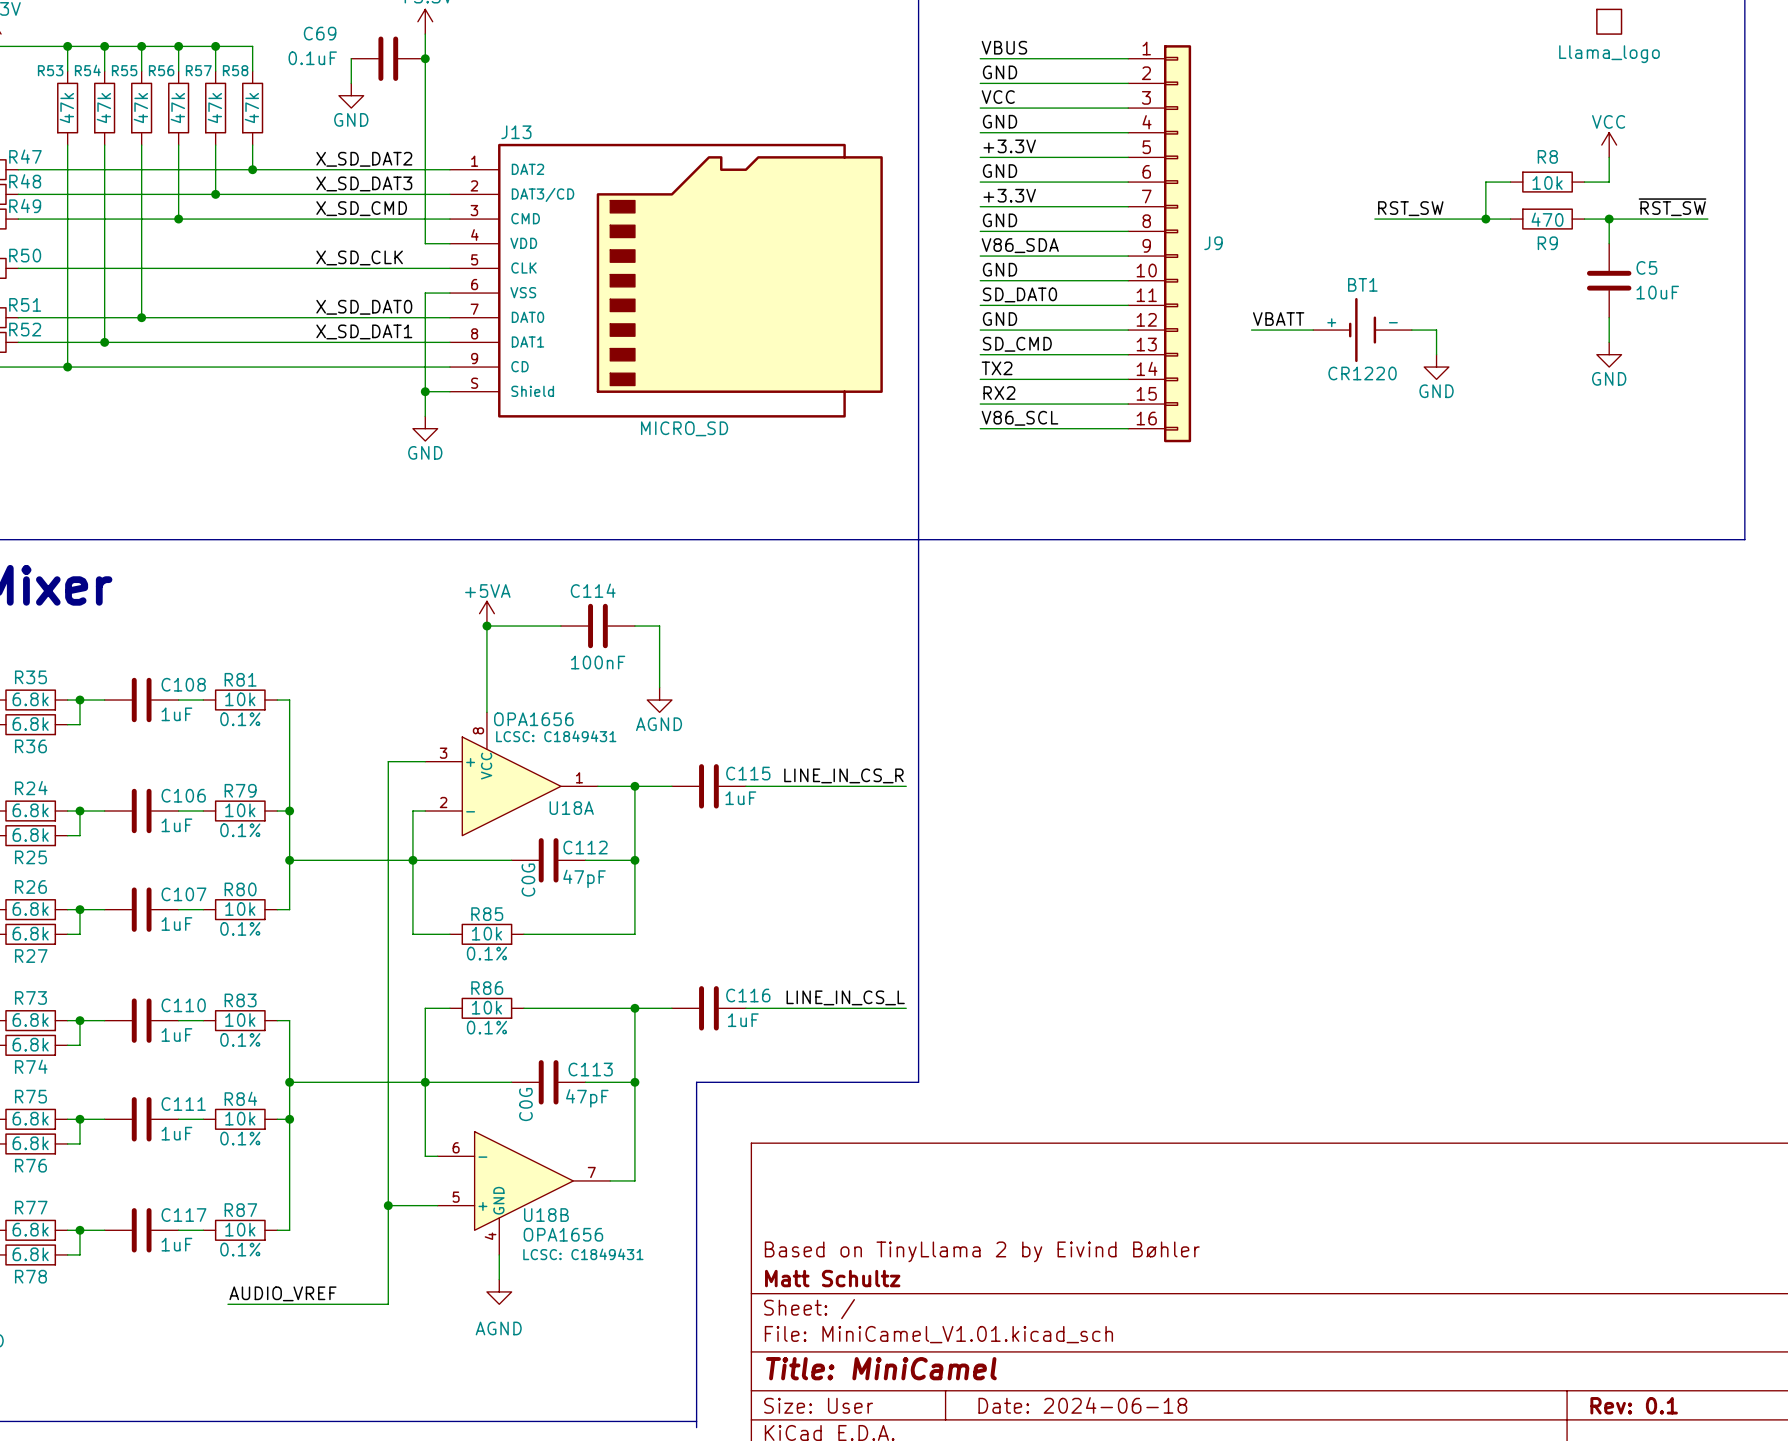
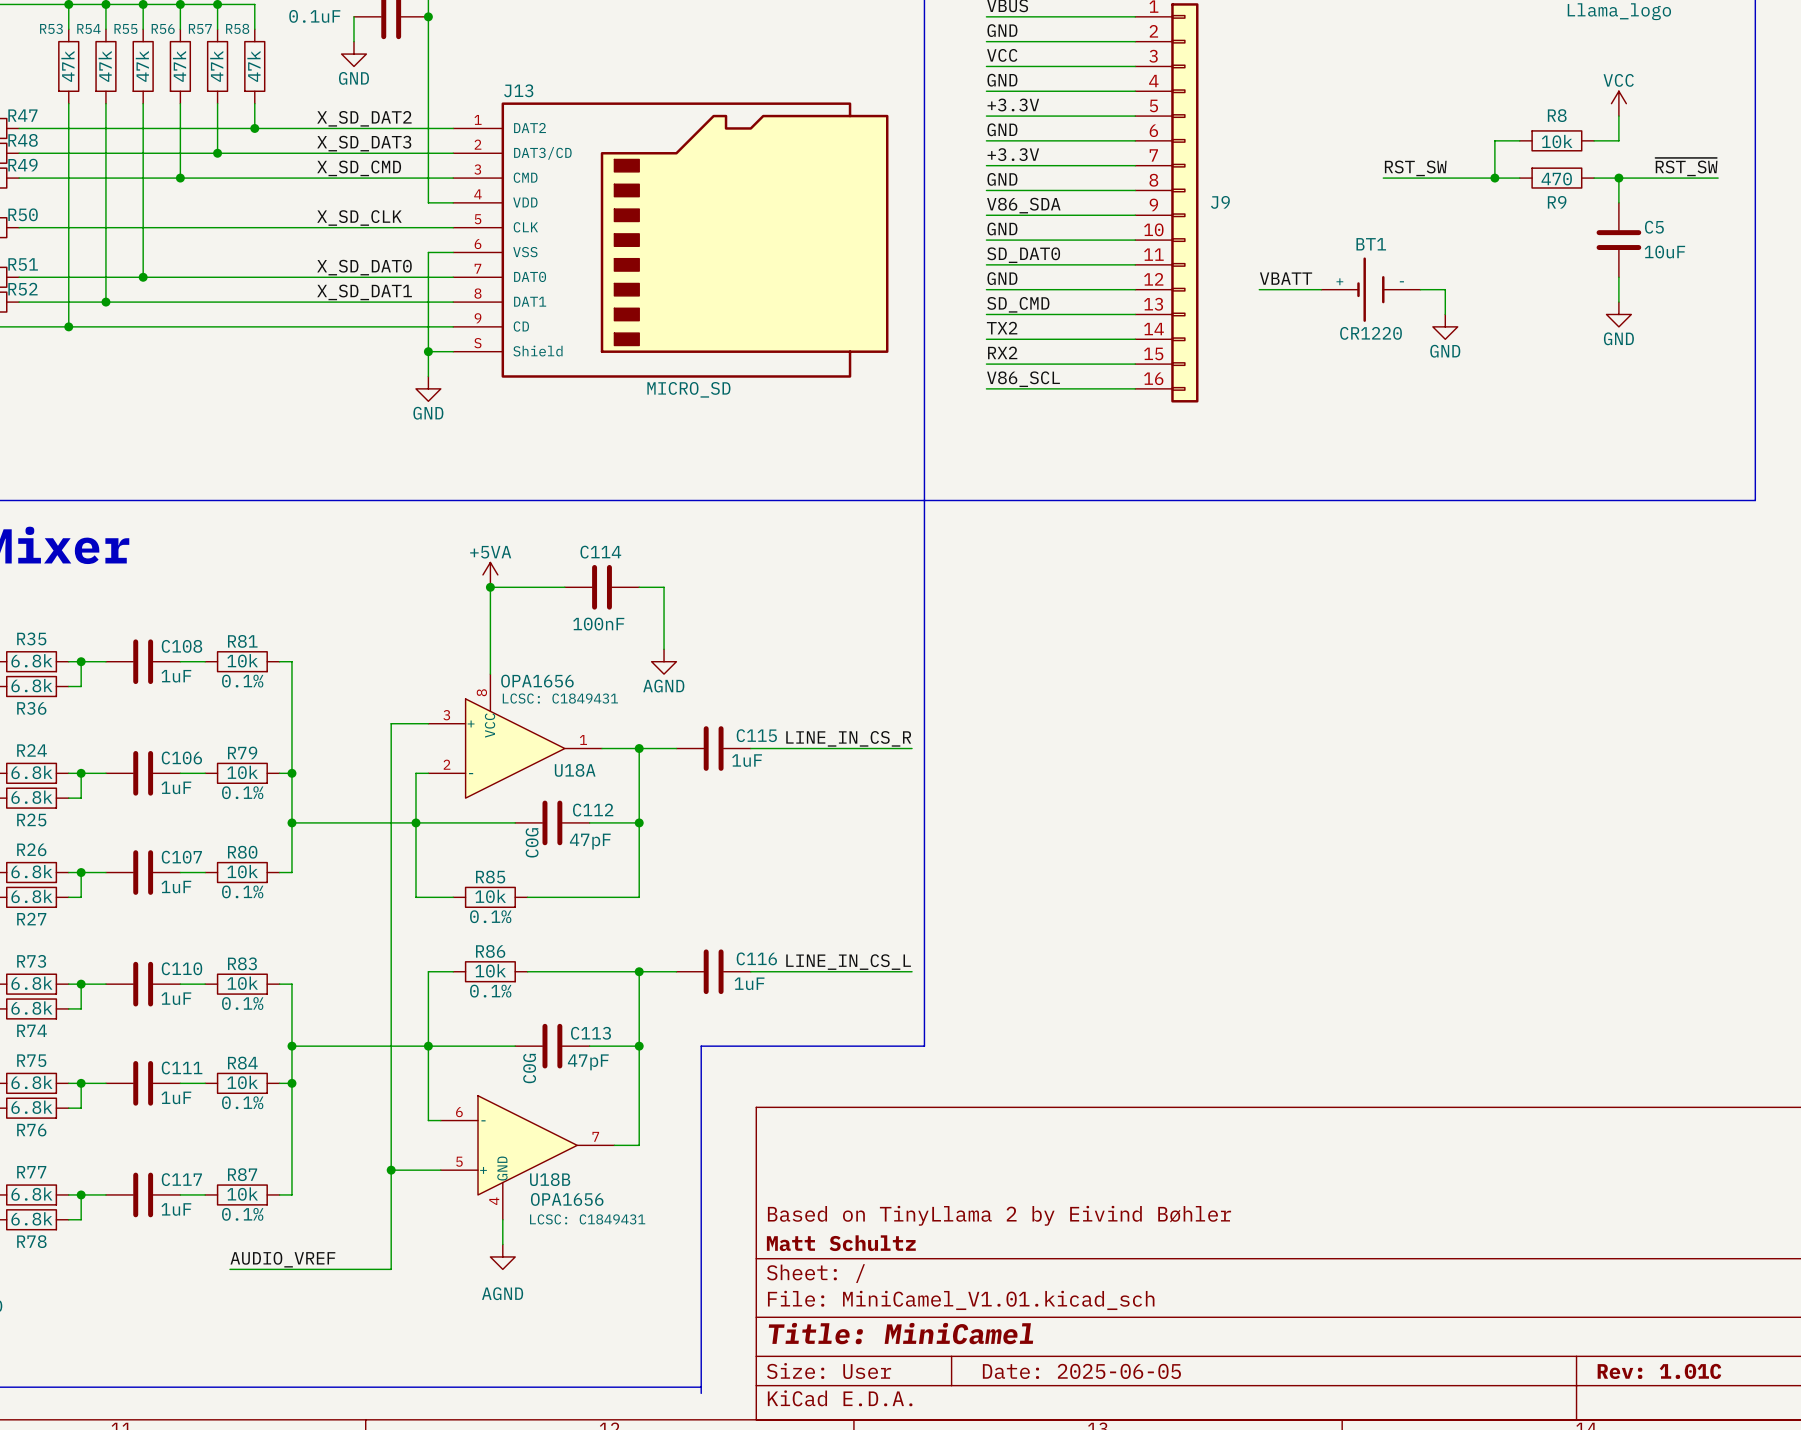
title block: Date: 2024-06-18 (1082, 1405) -> Date: 2025-06-05 (1081, 1371)
title block: Rev: 0.1 (1634, 1405) -> Rev: 1.01C (1659, 1371)

